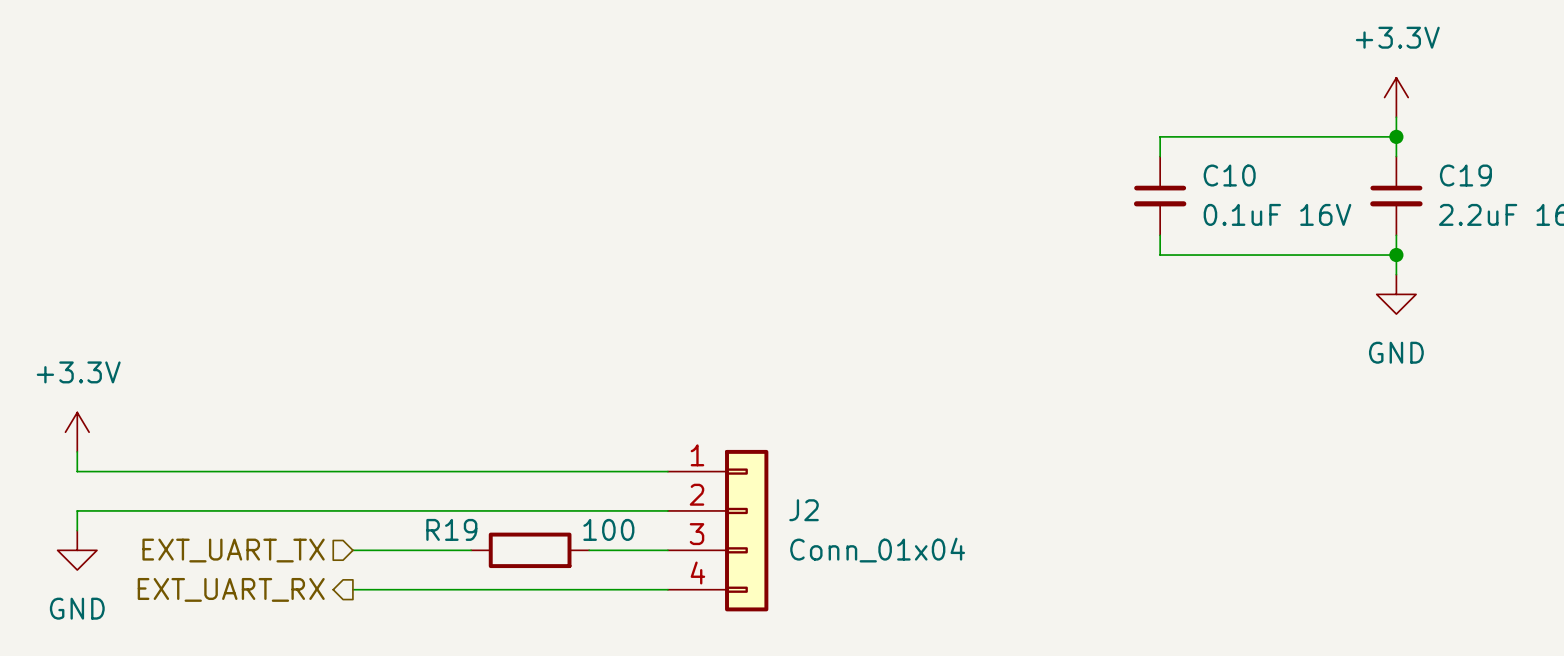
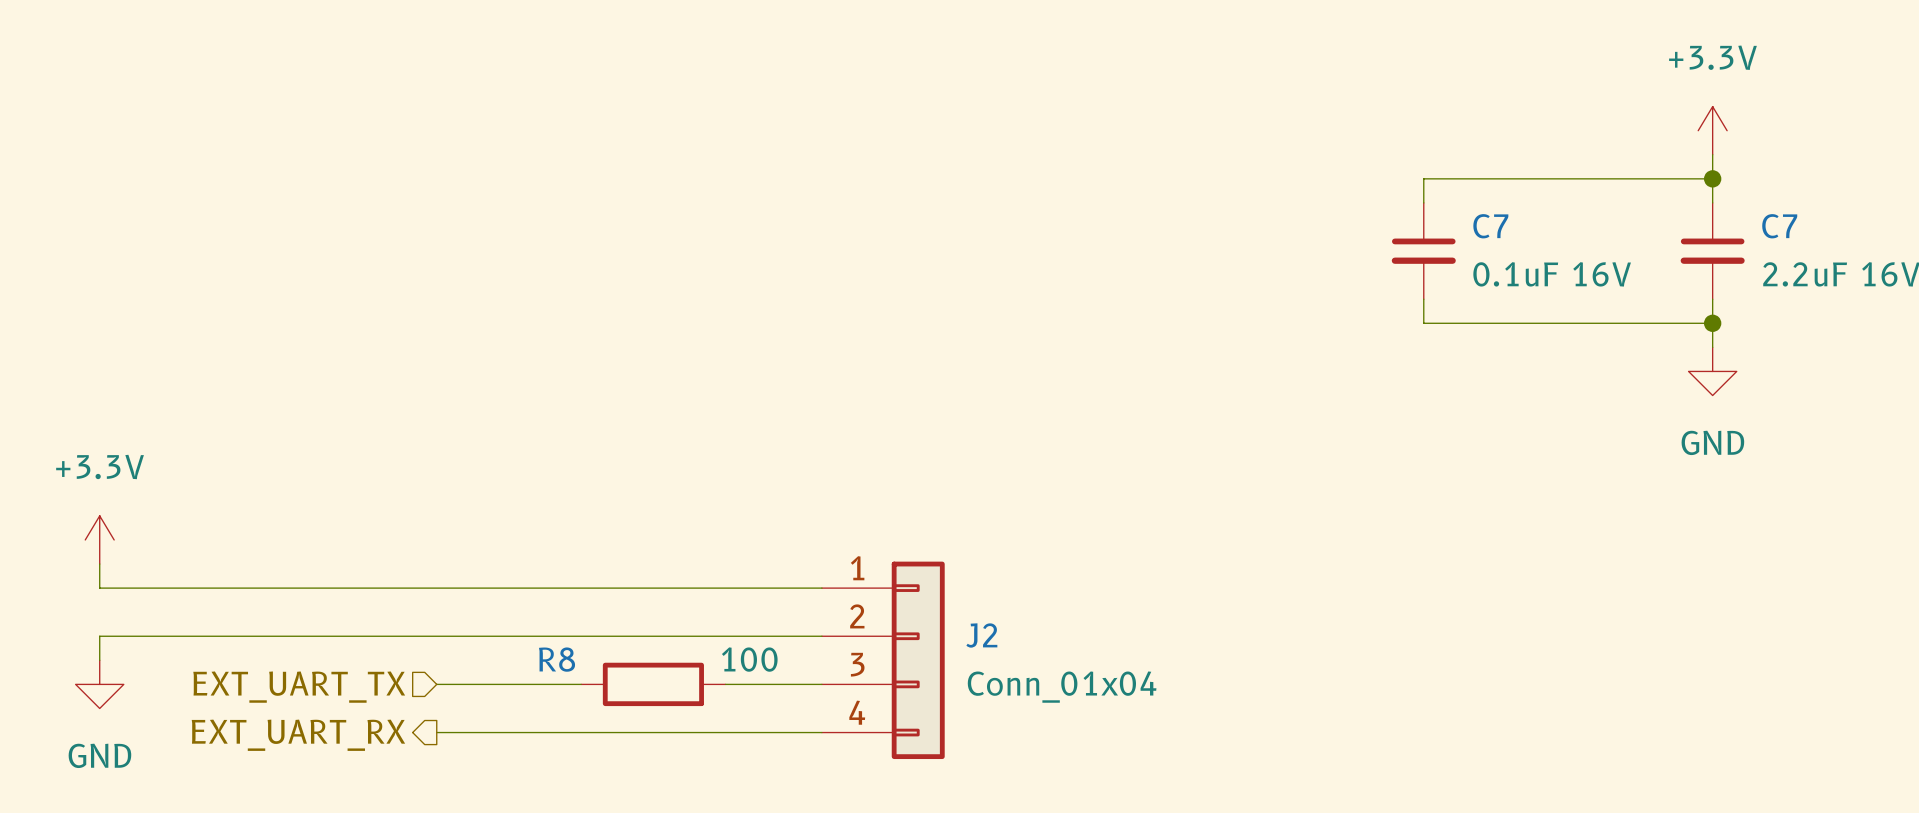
C10 name: C10 (1229, 175) -> C7 (1490, 226)
C19 name: C19 (1465, 175) -> C7 (1779, 226)
R19 name: R19 (451, 529) -> R8 (557, 659)

